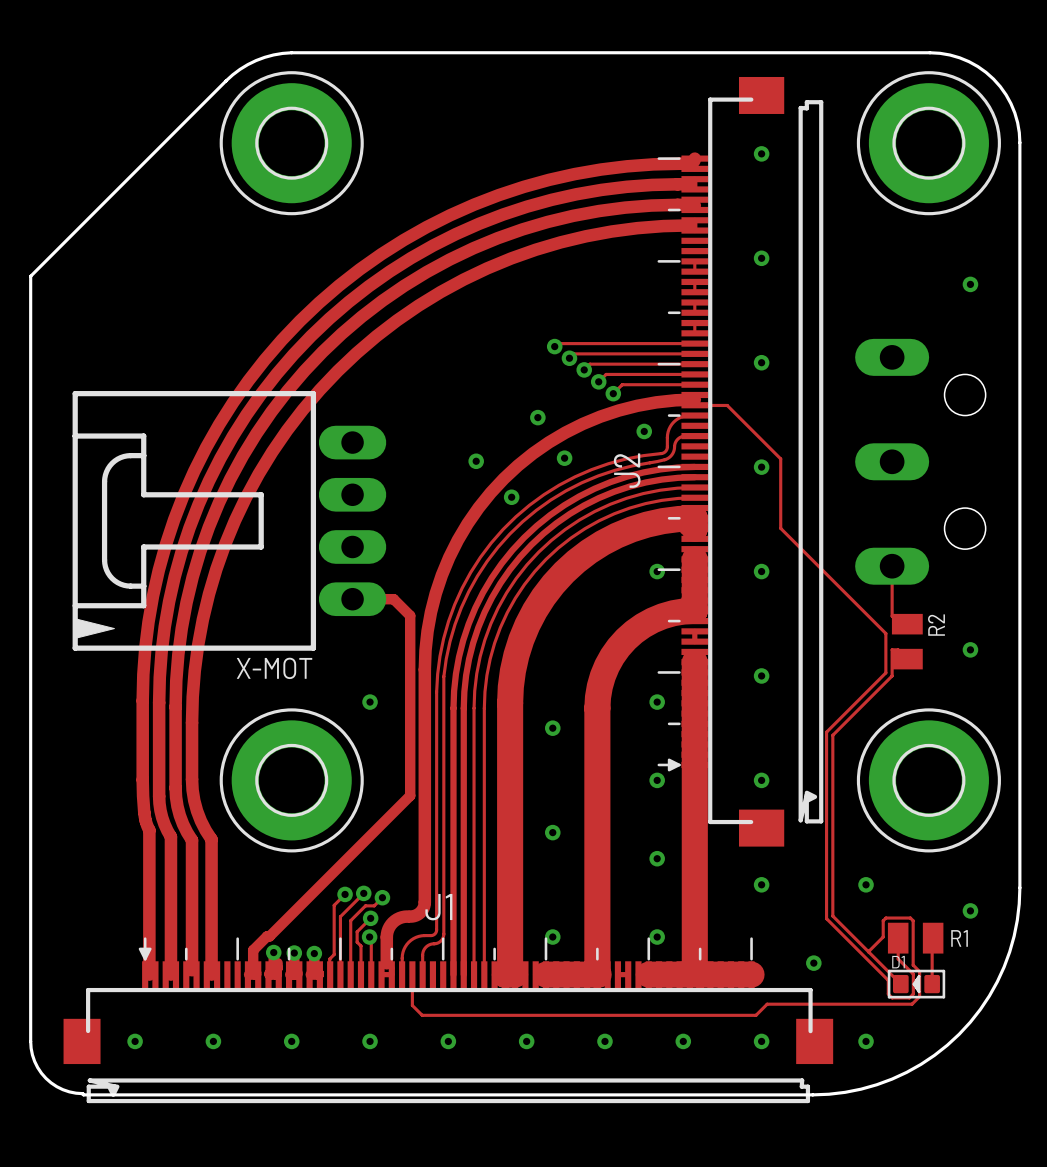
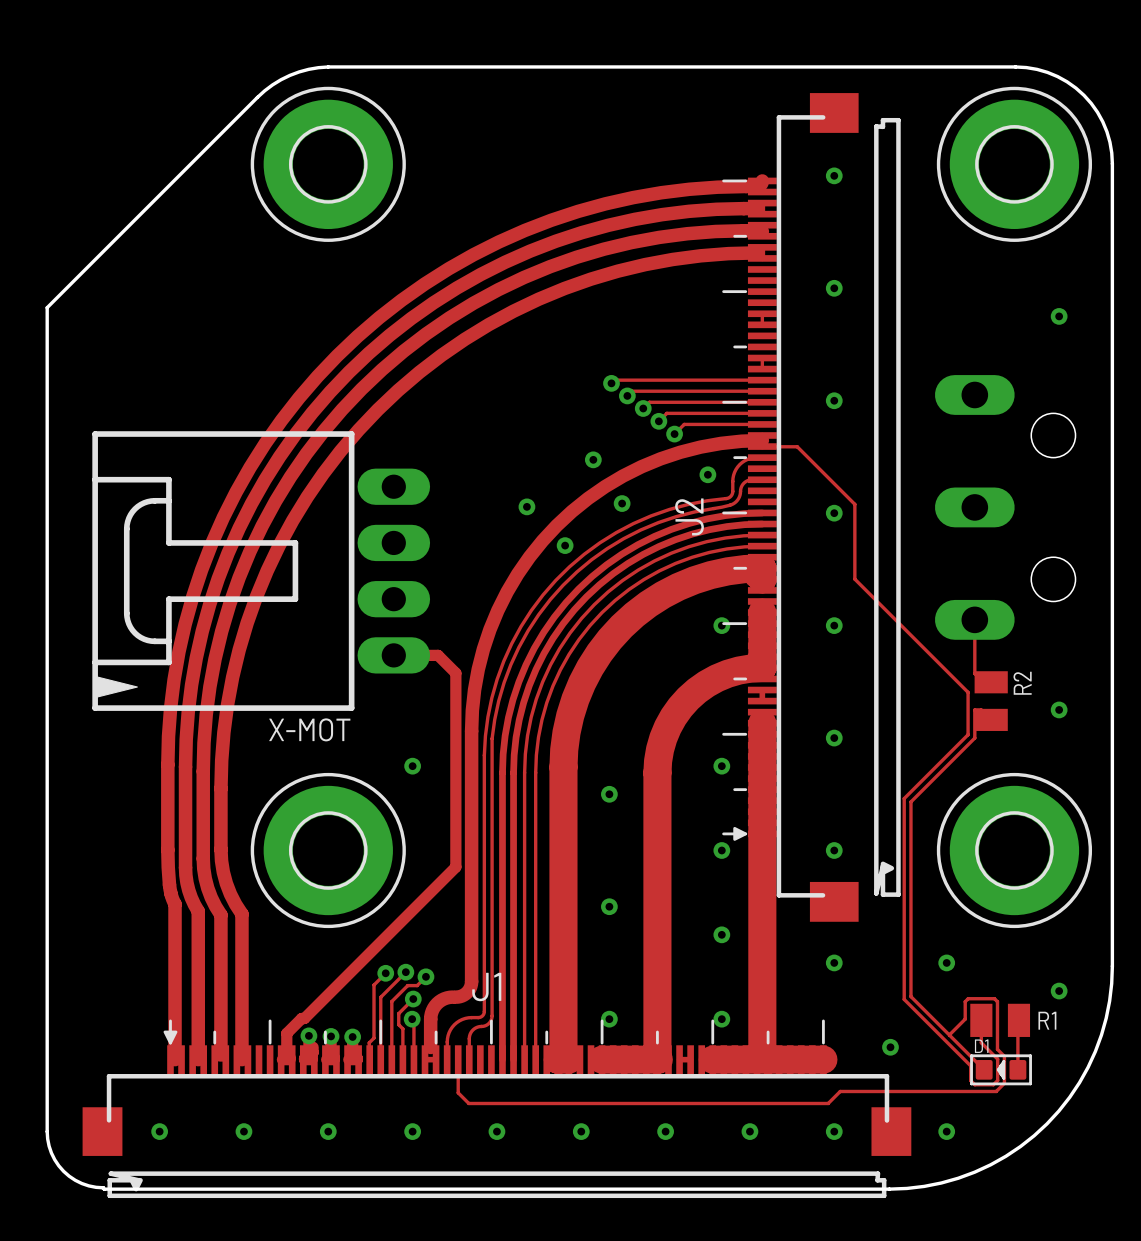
track: (694, 261) (694, 271) -> none
track: (694, 302) (694, 312) -> none

